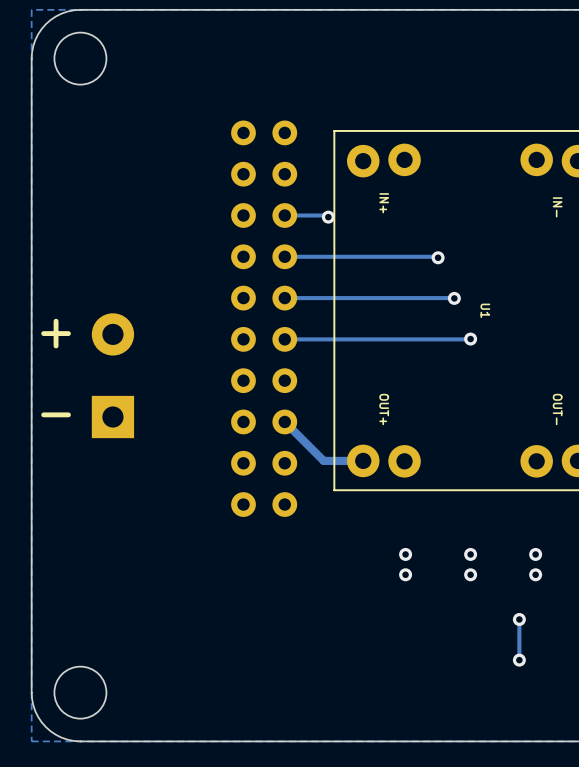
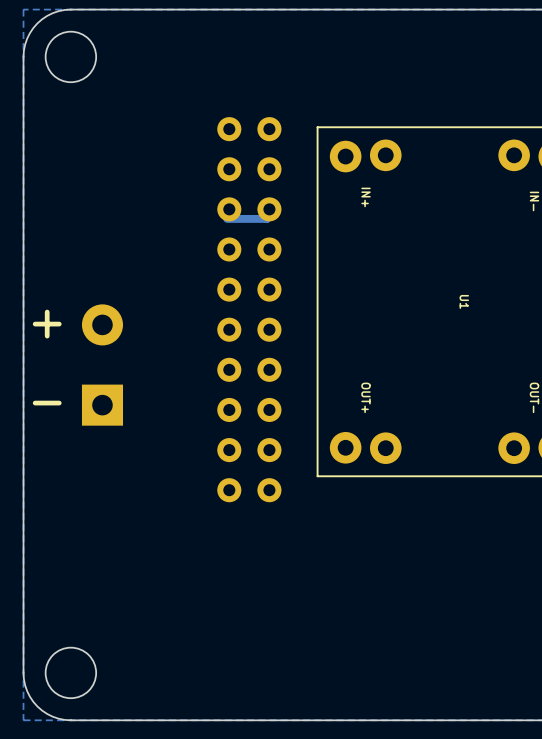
track: (284, 215) (326, 215) (328, 217) -> none
via: (328, 217) -> none
track: none -> (267, 218) (227, 218)
track: (284, 256) (438, 257) -> none
via: (438, 257) -> none
track: (284, 298) (454, 298) -> none
via: (454, 298) -> none
track: (470, 339) (284, 339) -> none
via: (470, 339) -> none
track: (284, 421) (323, 460) (363, 460) -> none
via: (405, 554) -> none
via: (470, 554) -> none
via: (535, 554) -> none
via: (405, 574) -> none
via: (470, 574) -> none
via: (535, 574) -> none
track: (519, 619) (519, 660) -> none
via: (519, 619) -> none
via: (519, 660) -> none

